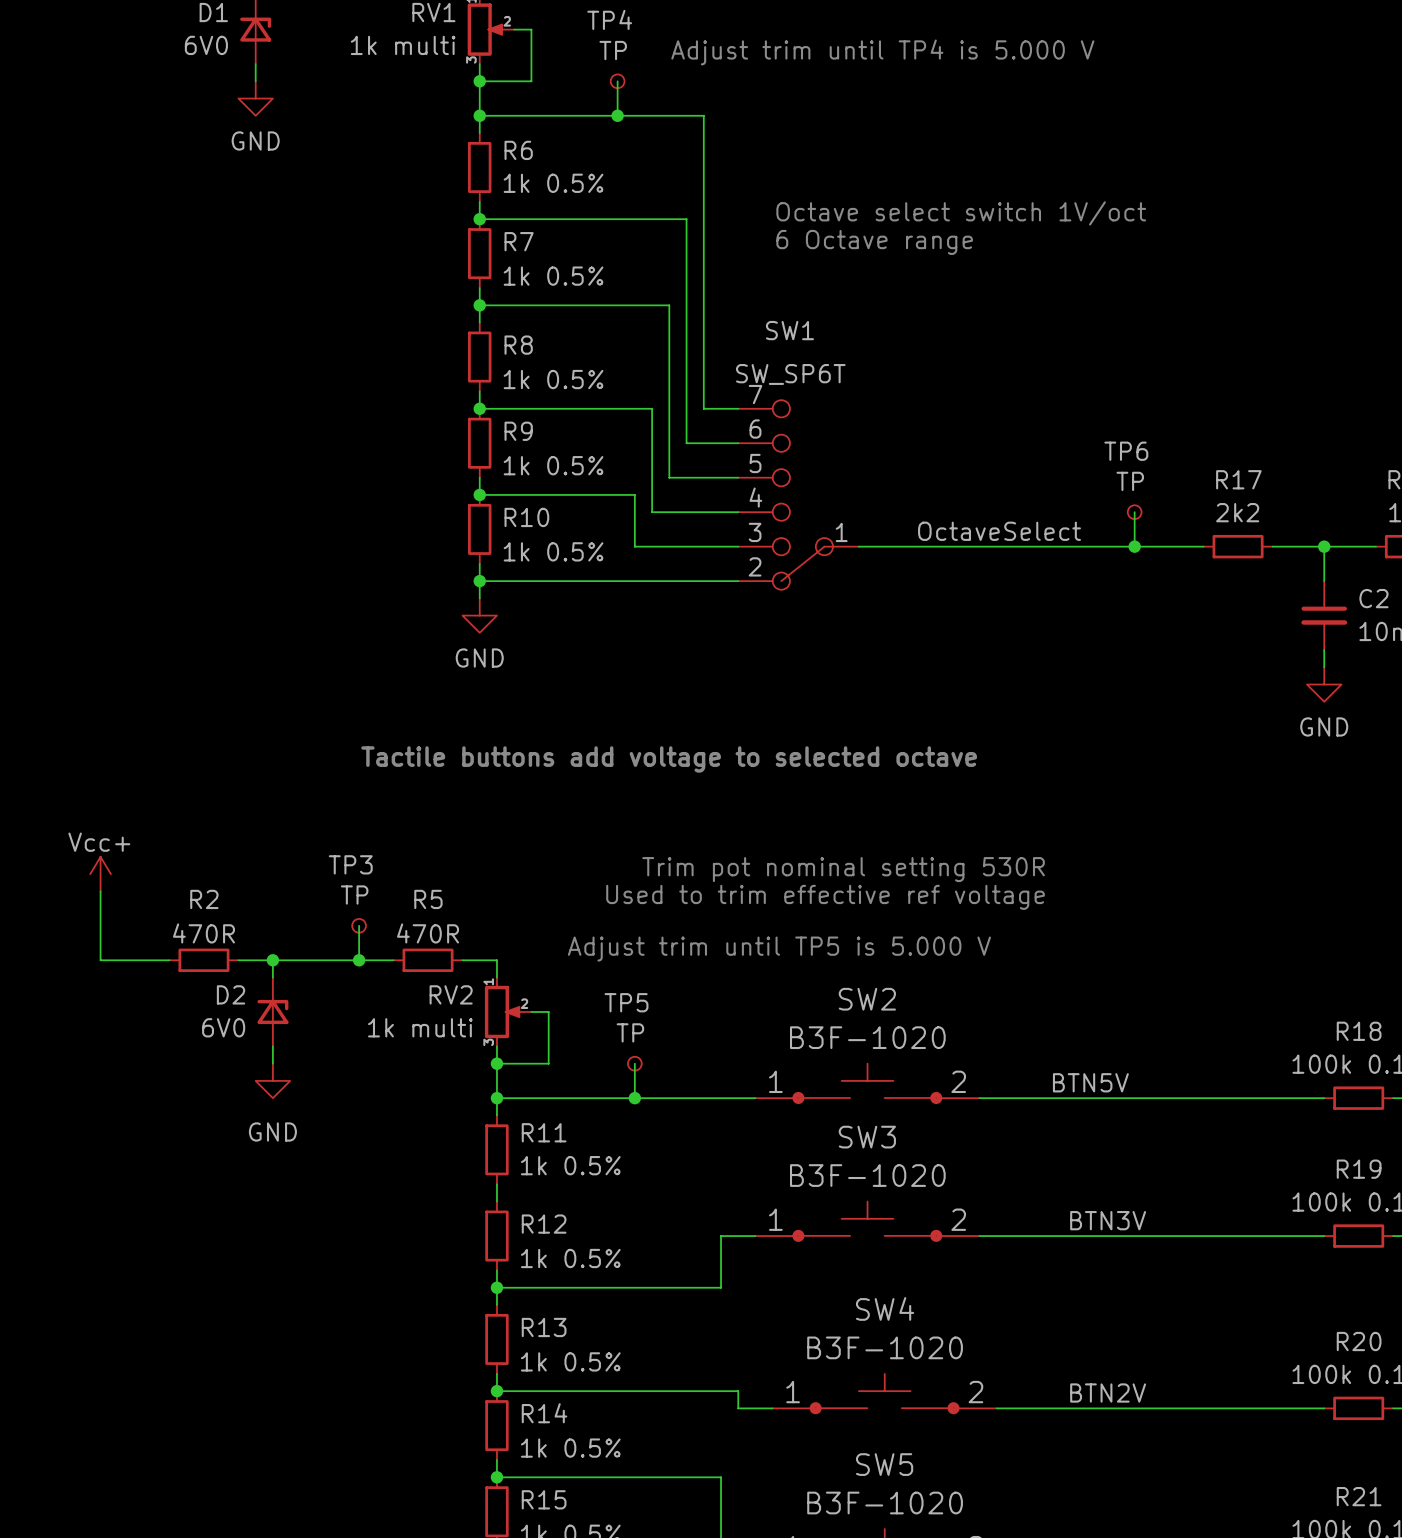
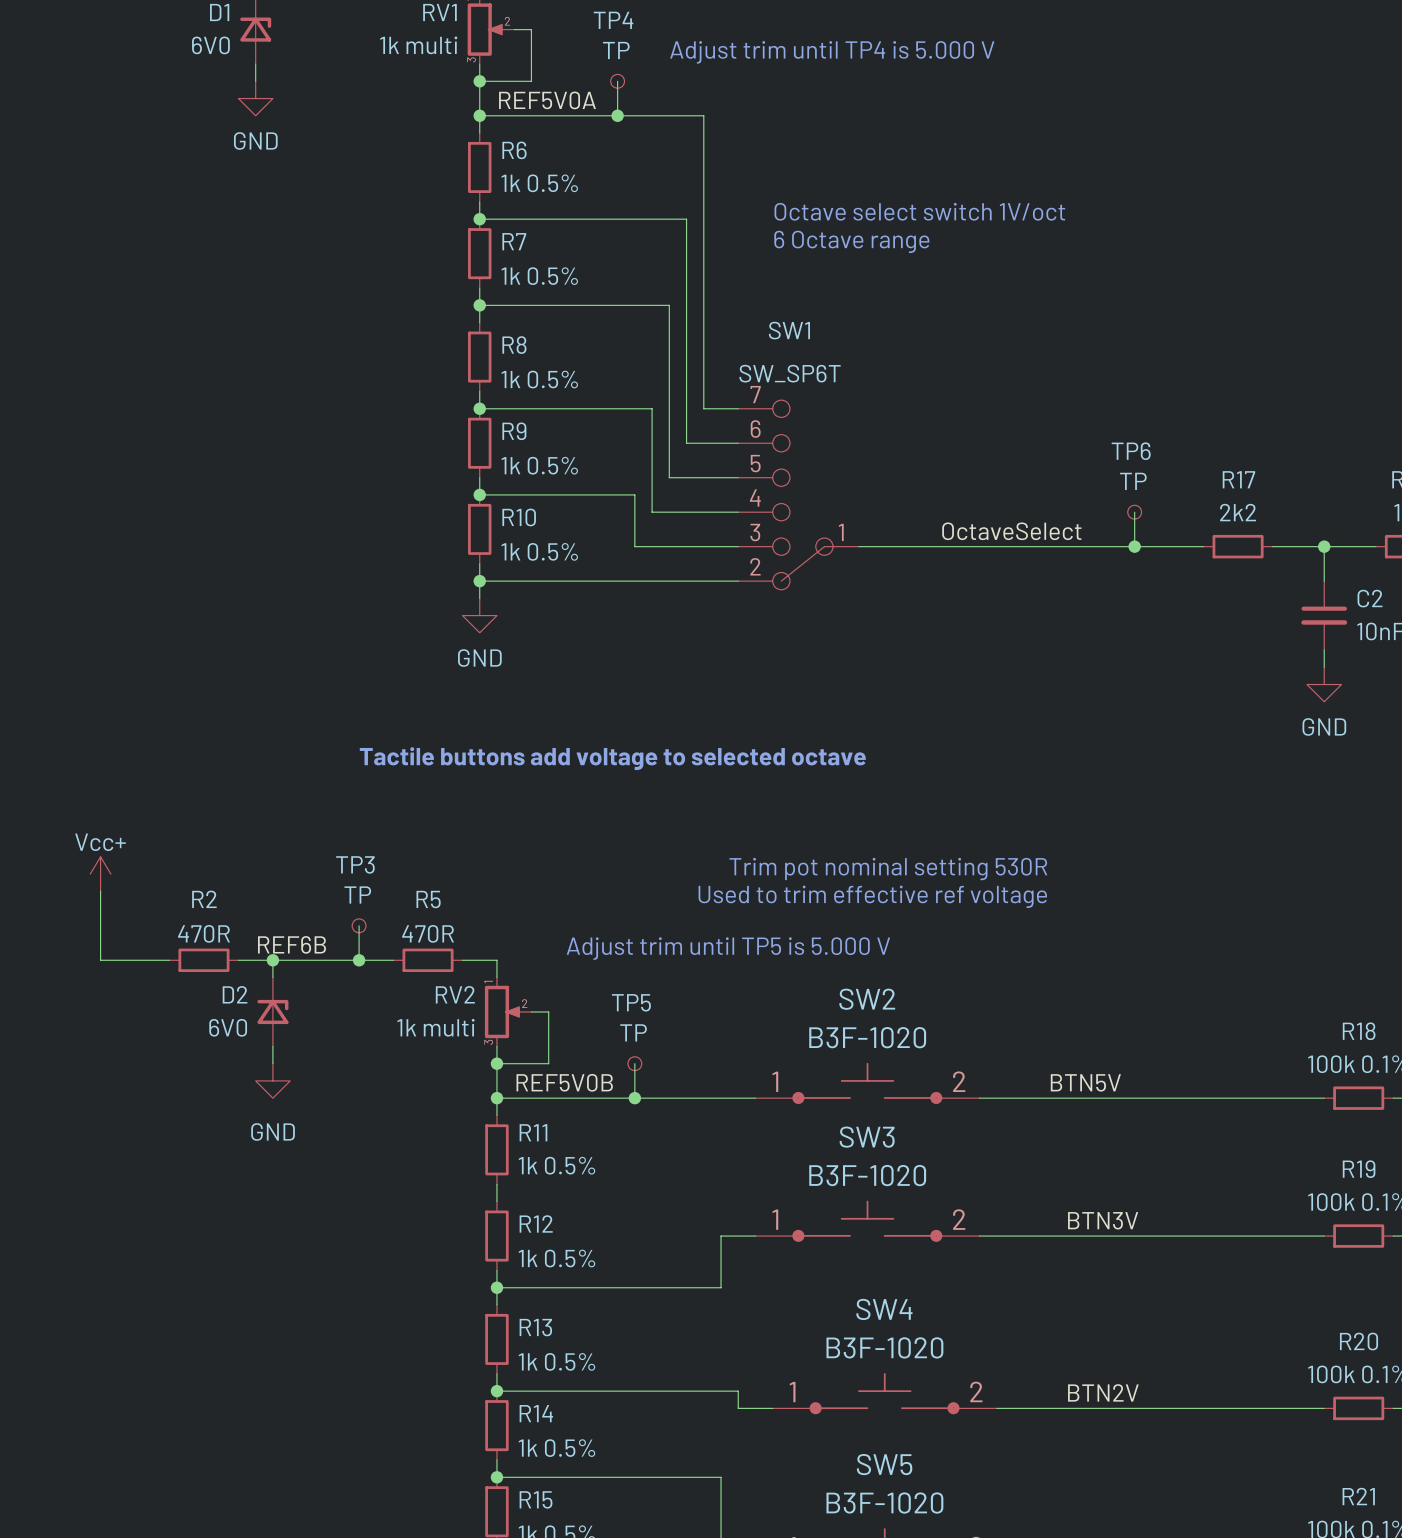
label: none -> REF5V0A (547, 100)
label: none -> REF6B (291, 944)
label: none -> REF5V0B (564, 1082)

